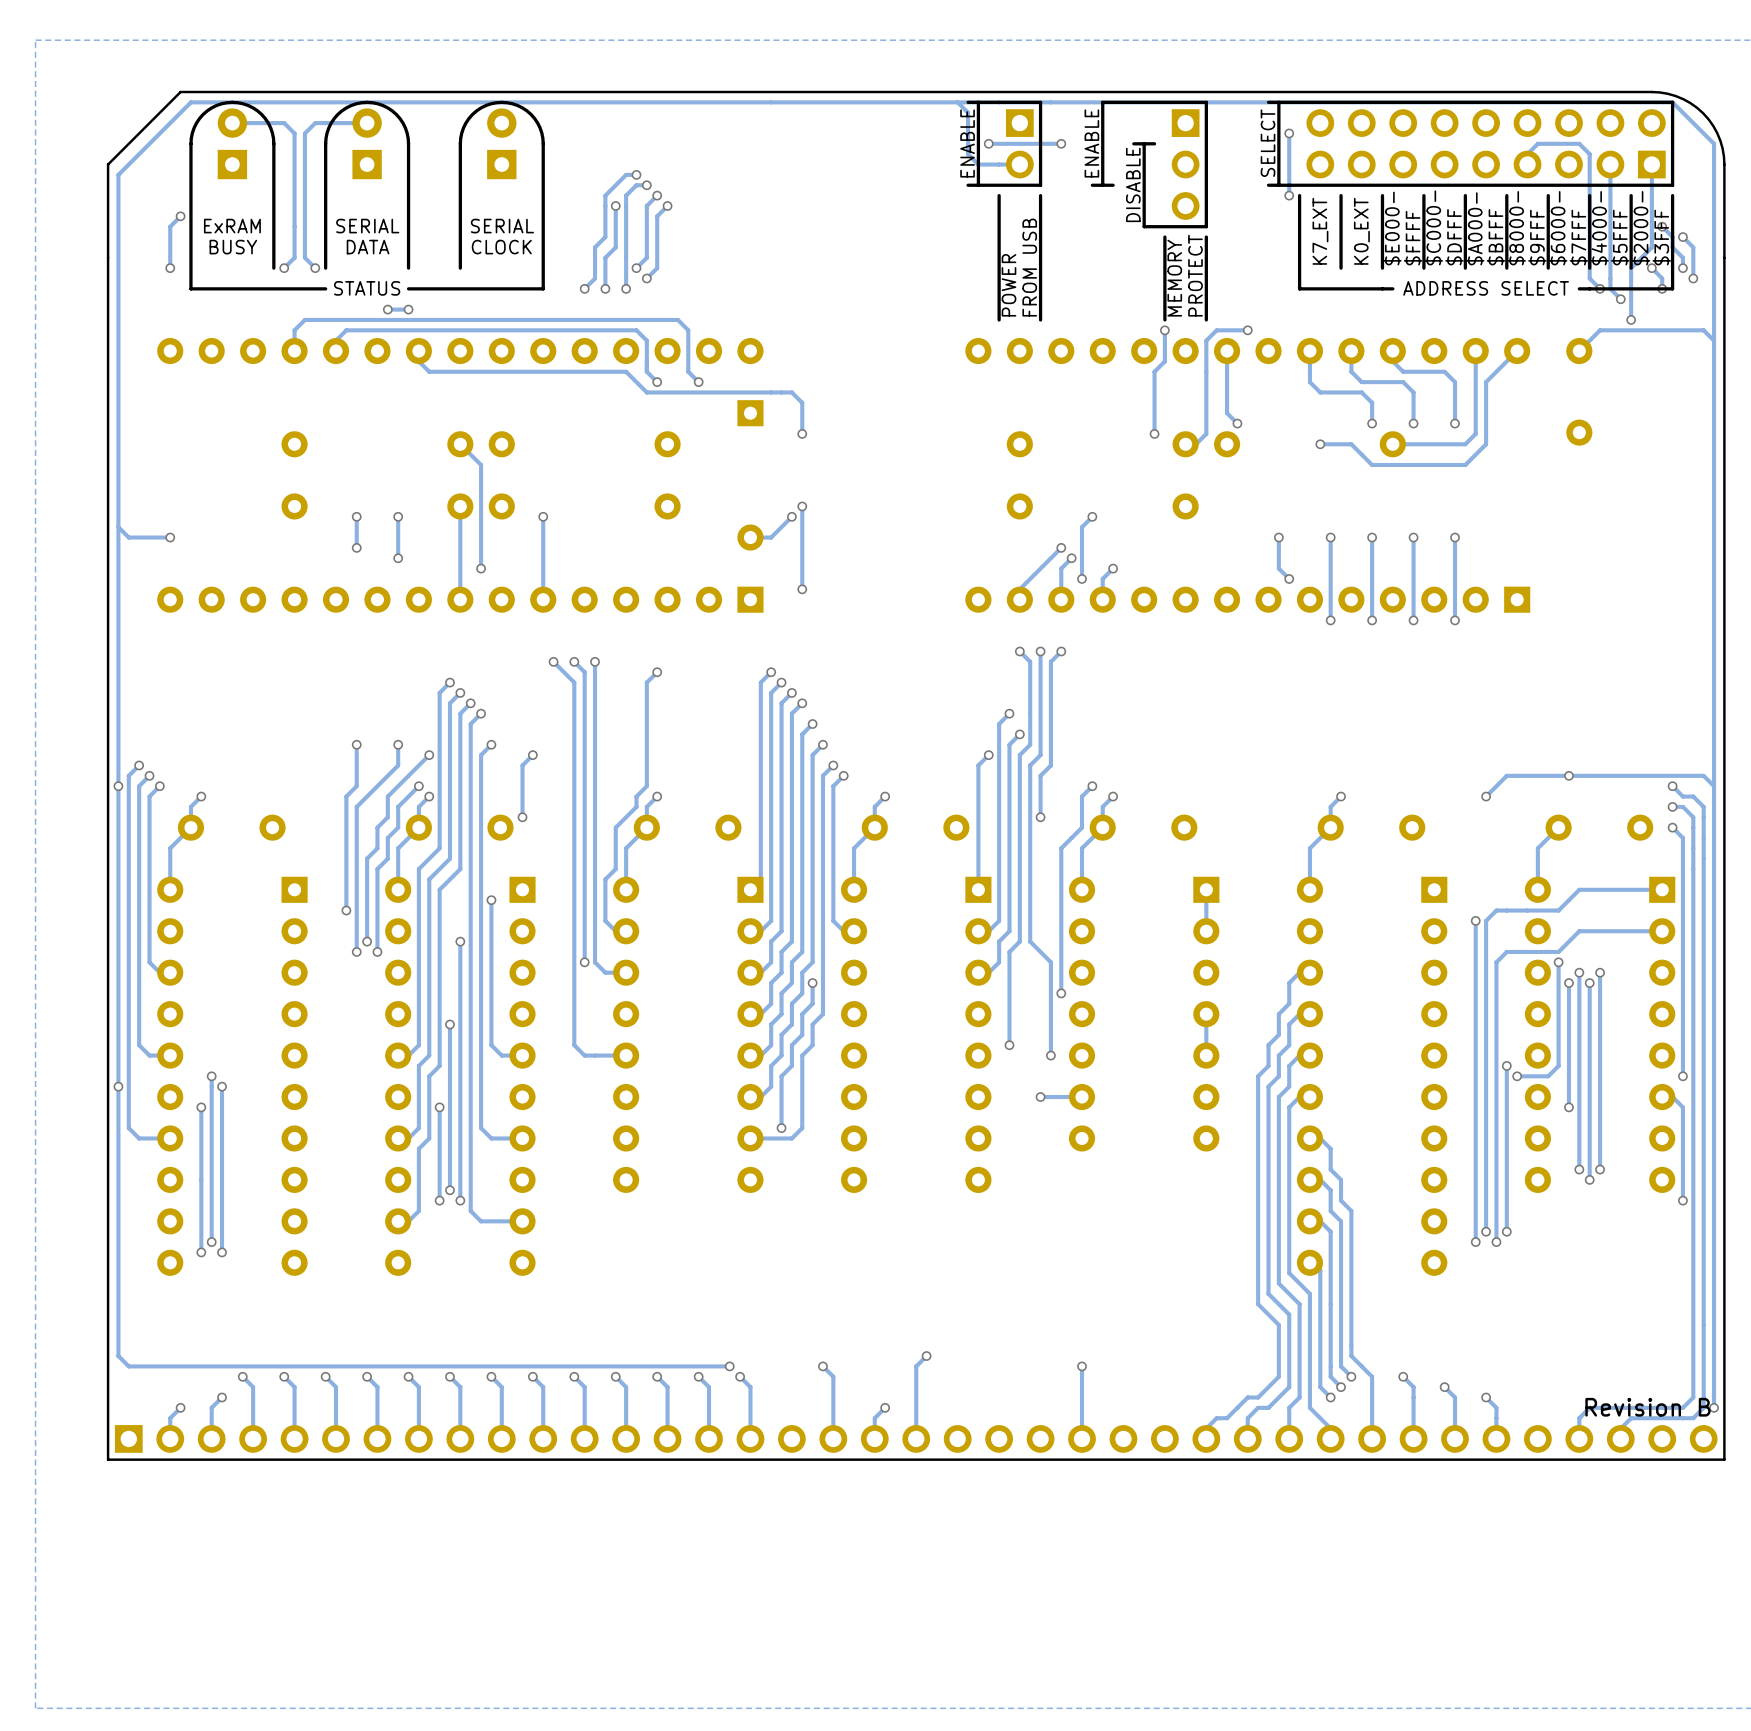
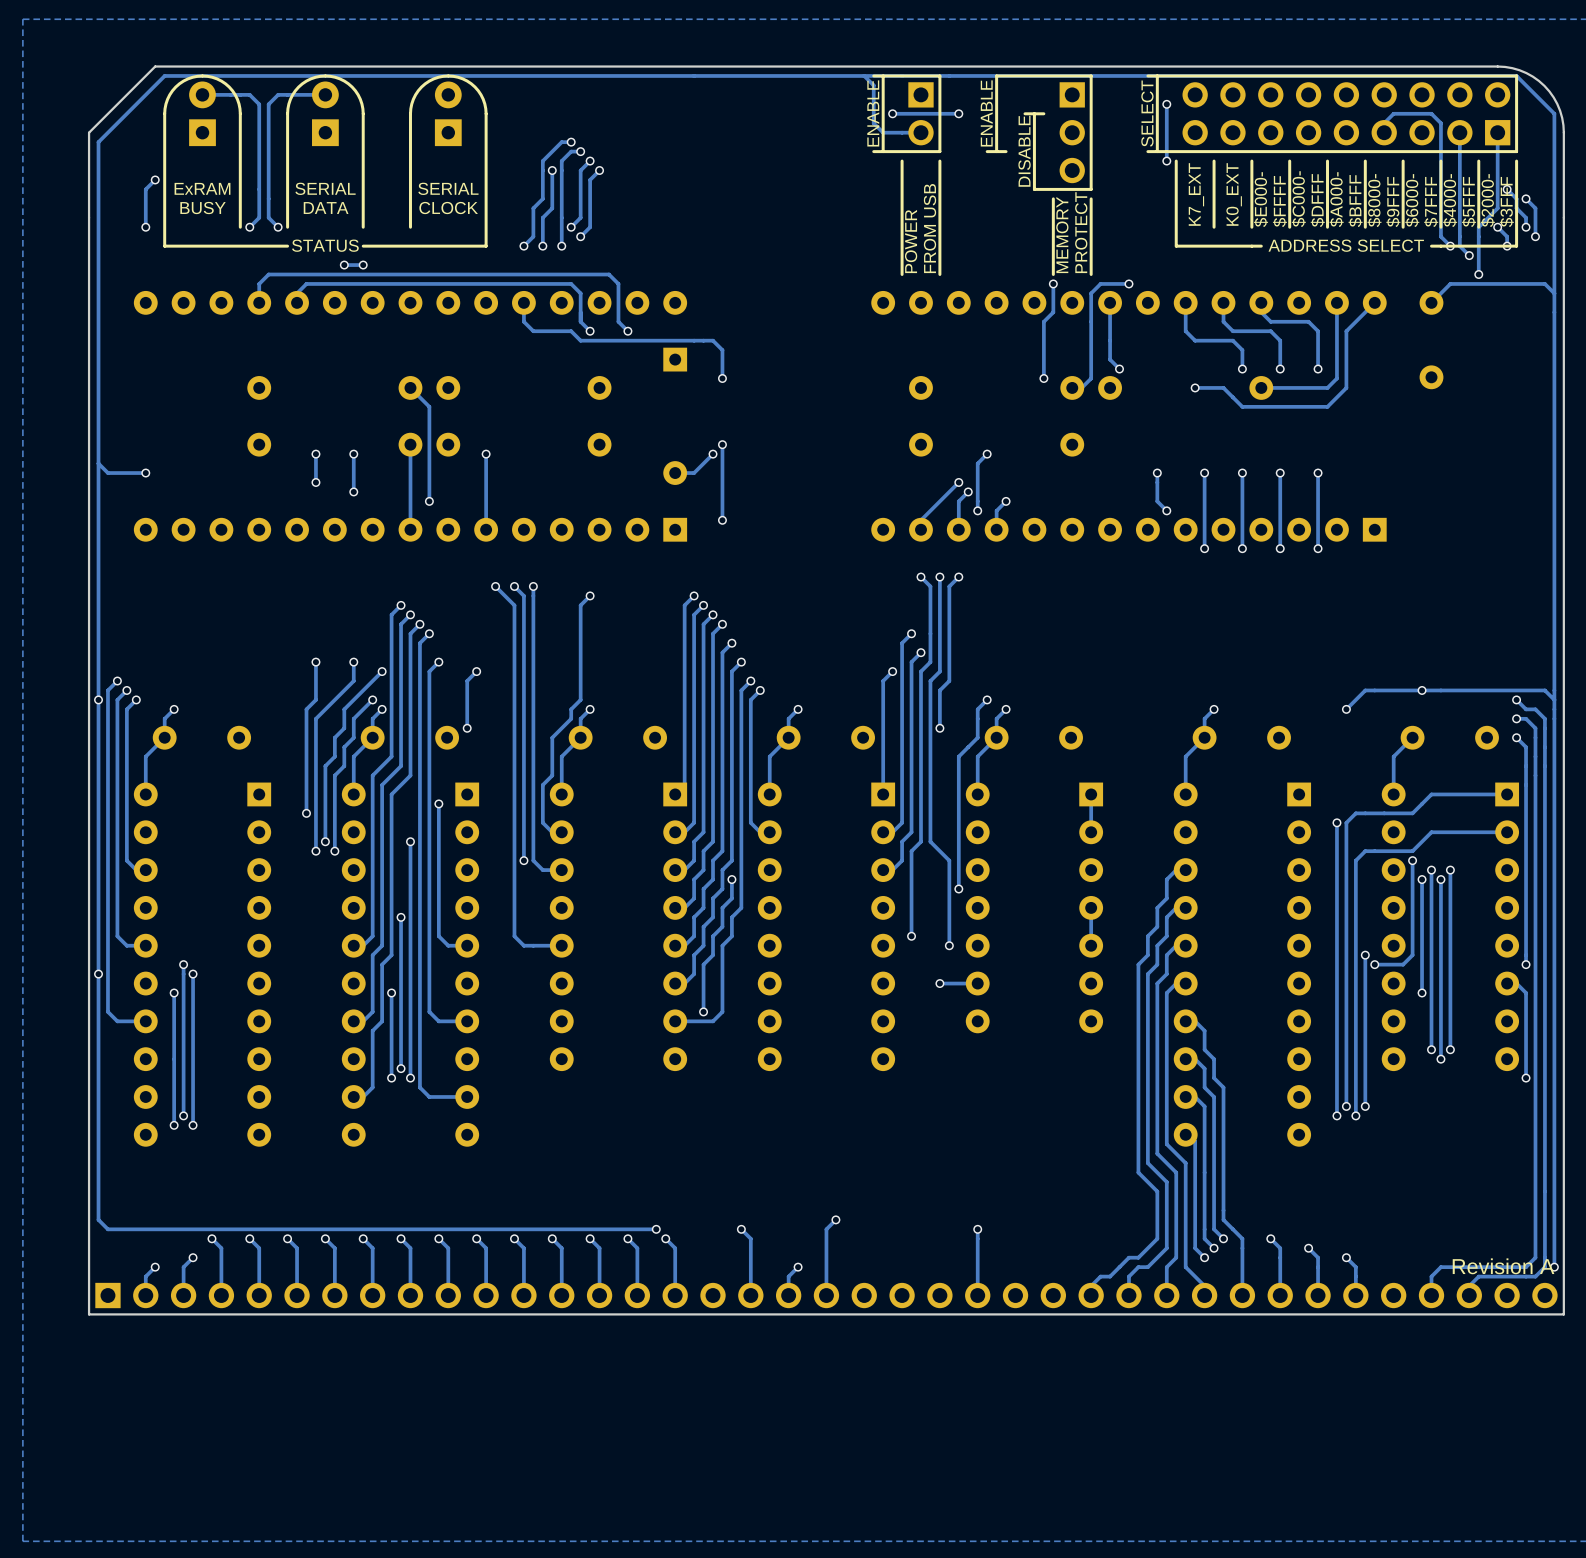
track: (418, 351) (418, 361) (429, 371) (626, 371) (636, 382) -> (523, 302) (523, 321) (533, 331) (571, 331)
text: Revision B (1647, 1407) -> Revision A (1503, 1266)

